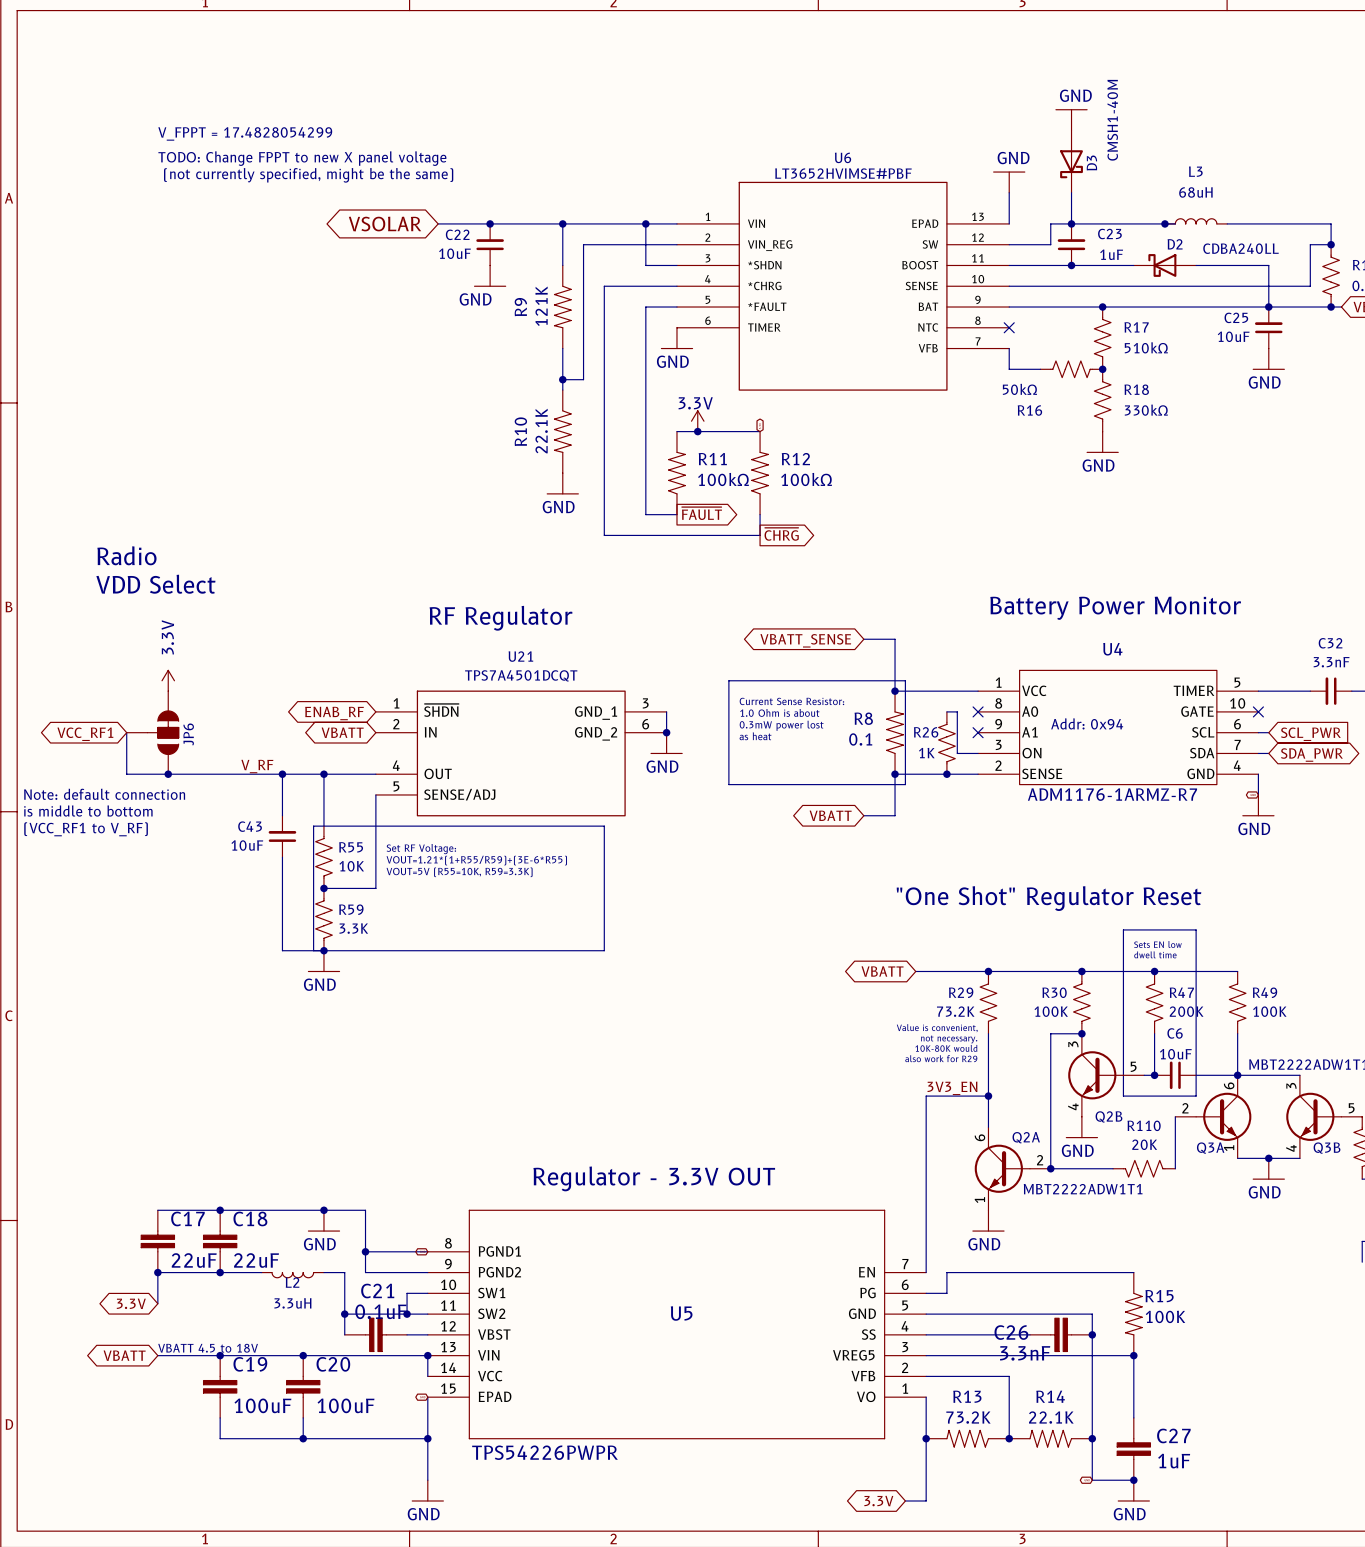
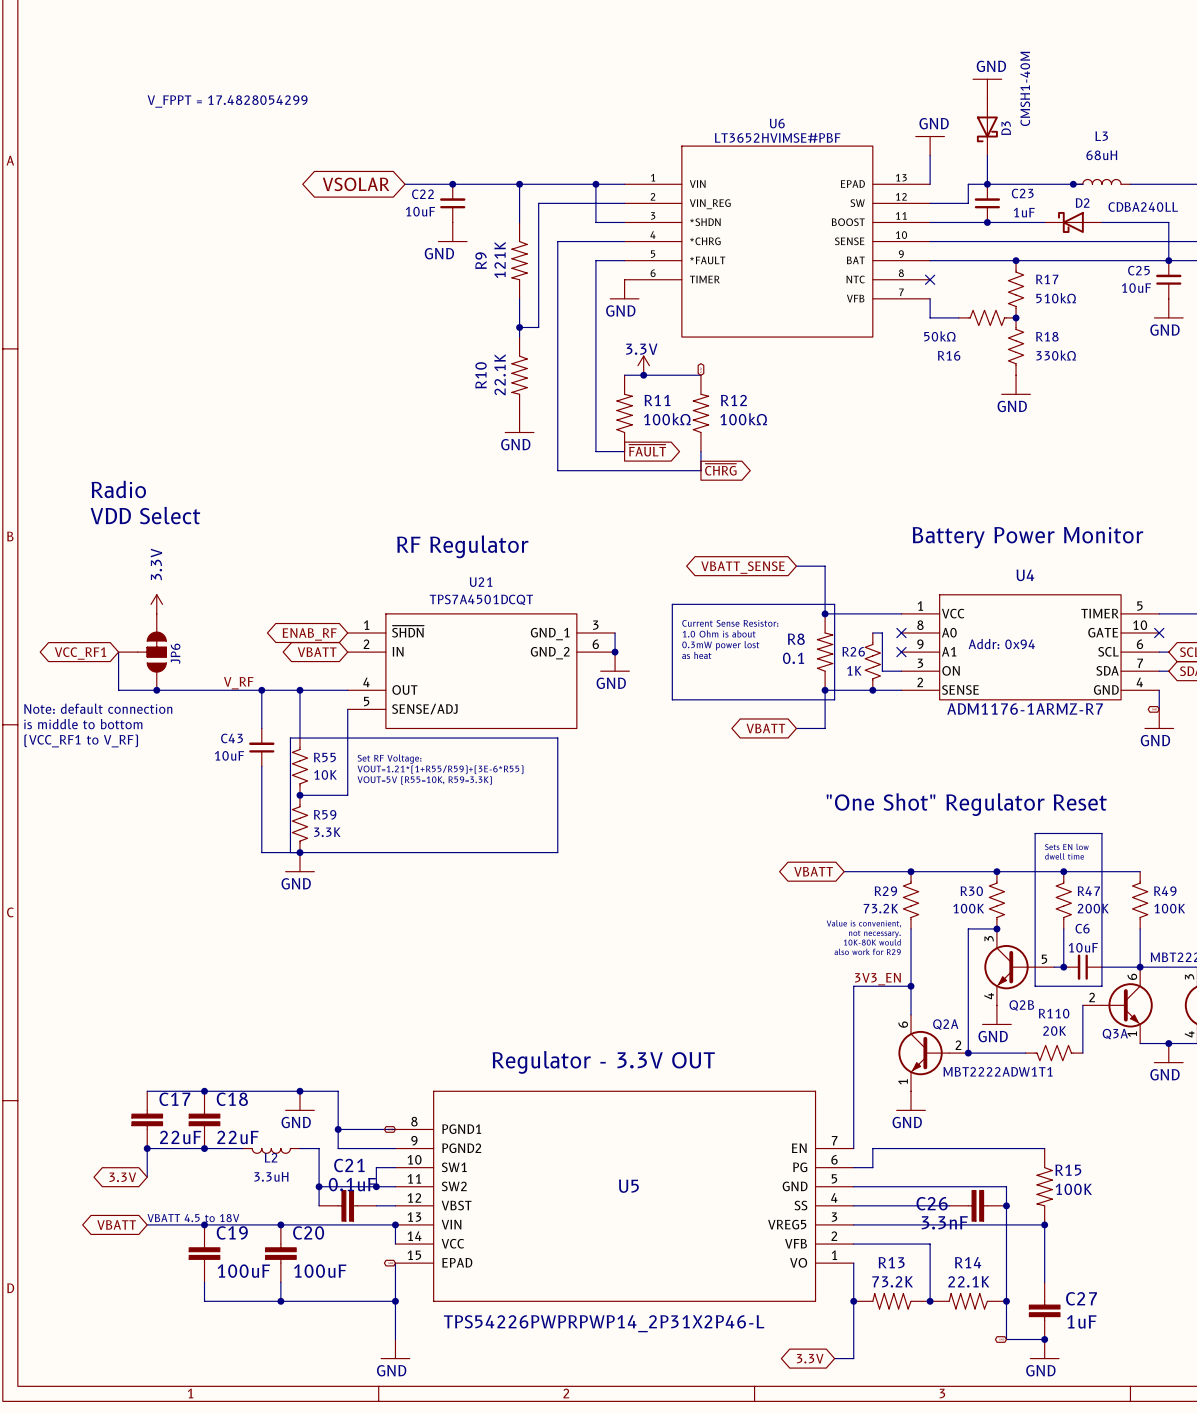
text: TODO: Change FPPT to new X panel voltage (302, 158) -> none
text: (not currently specified, might be the same) (308, 175) -> none
U5 value: TPS54226PWPR (545, 1452) -> TPS54226PWPRPWP14_2P31X2P46-L (604, 1323)

